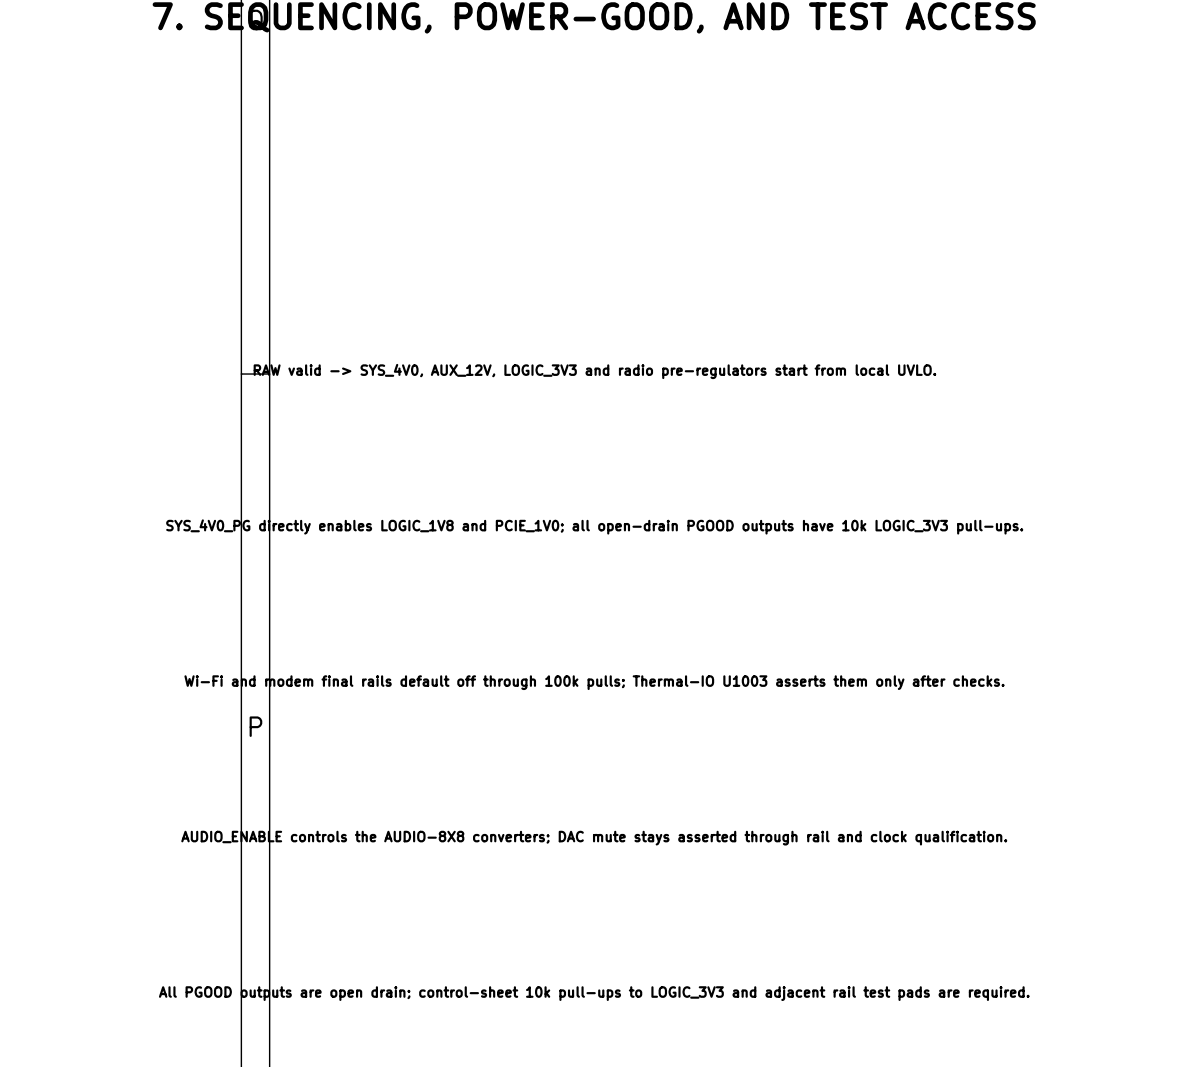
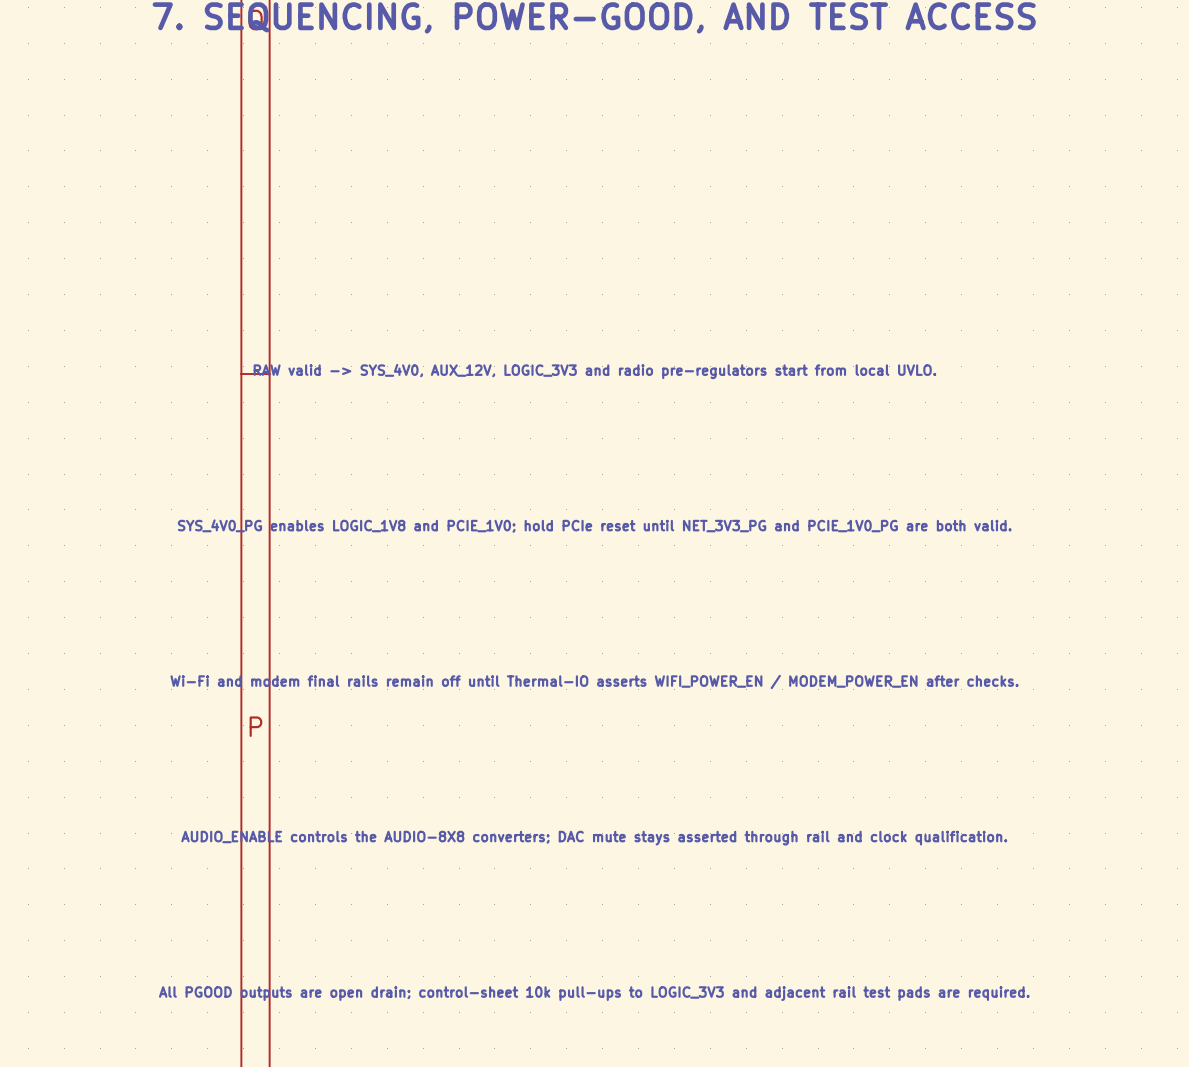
text: SYS_4V0_PG directly enables LOGIC_1V8 and PCIE_1V0; all open-drain PGOOD outputs have 10k LOGIC_3V3 pull-ups. (594, 526) -> SYS_4V0_PG enables LOGIC_1V8 and PCIE_1V0; hold PCIe reset until NET_3V3_PG and PCIE_1V0_PG are both valid. (594, 526)
text: Wi-Fi and modem final rails default off through 100k pulls; Thermal-IO U1003 asserts them only after checks. (594, 682) -> Wi-Fi and modem final rails remain off until Thermal-IO asserts WIFI_POWER_EN / MODEM_POWER_EN after checks. (594, 681)

